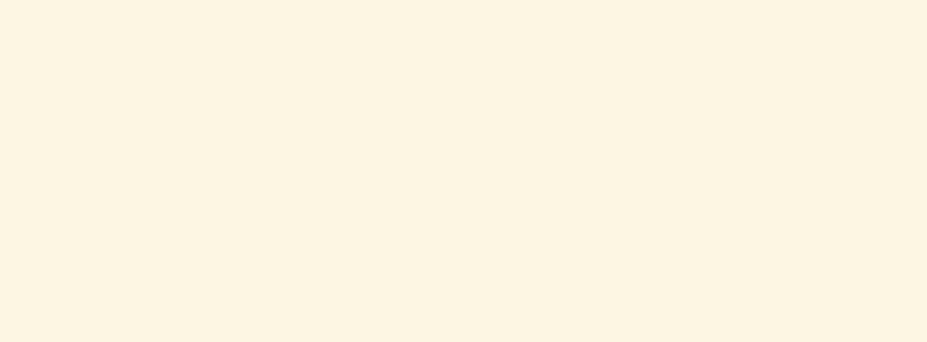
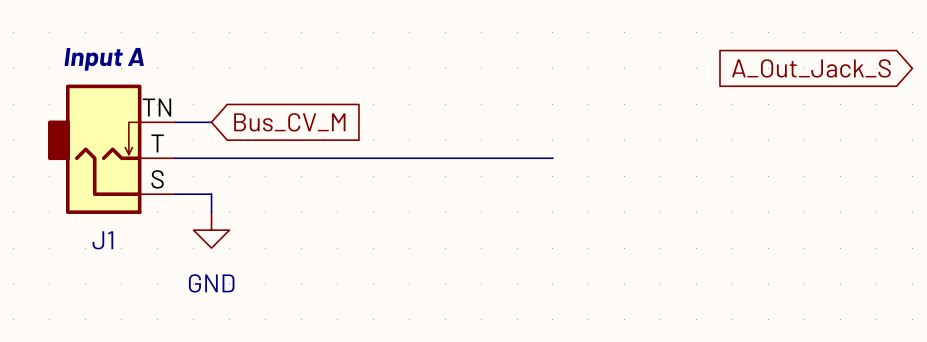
global label: none -> A_Out_Jack_S (811, 68)
wire: none -> (175, 122) (211, 122)
global label: none -> Bus_CV_M (289, 122)
J1: none -> (111, 149)
wire: none -> (175, 158) (552, 158)
wire: none -> (175, 194) (211, 194) (211, 212)
power symbol: none -> GND (211, 230)

